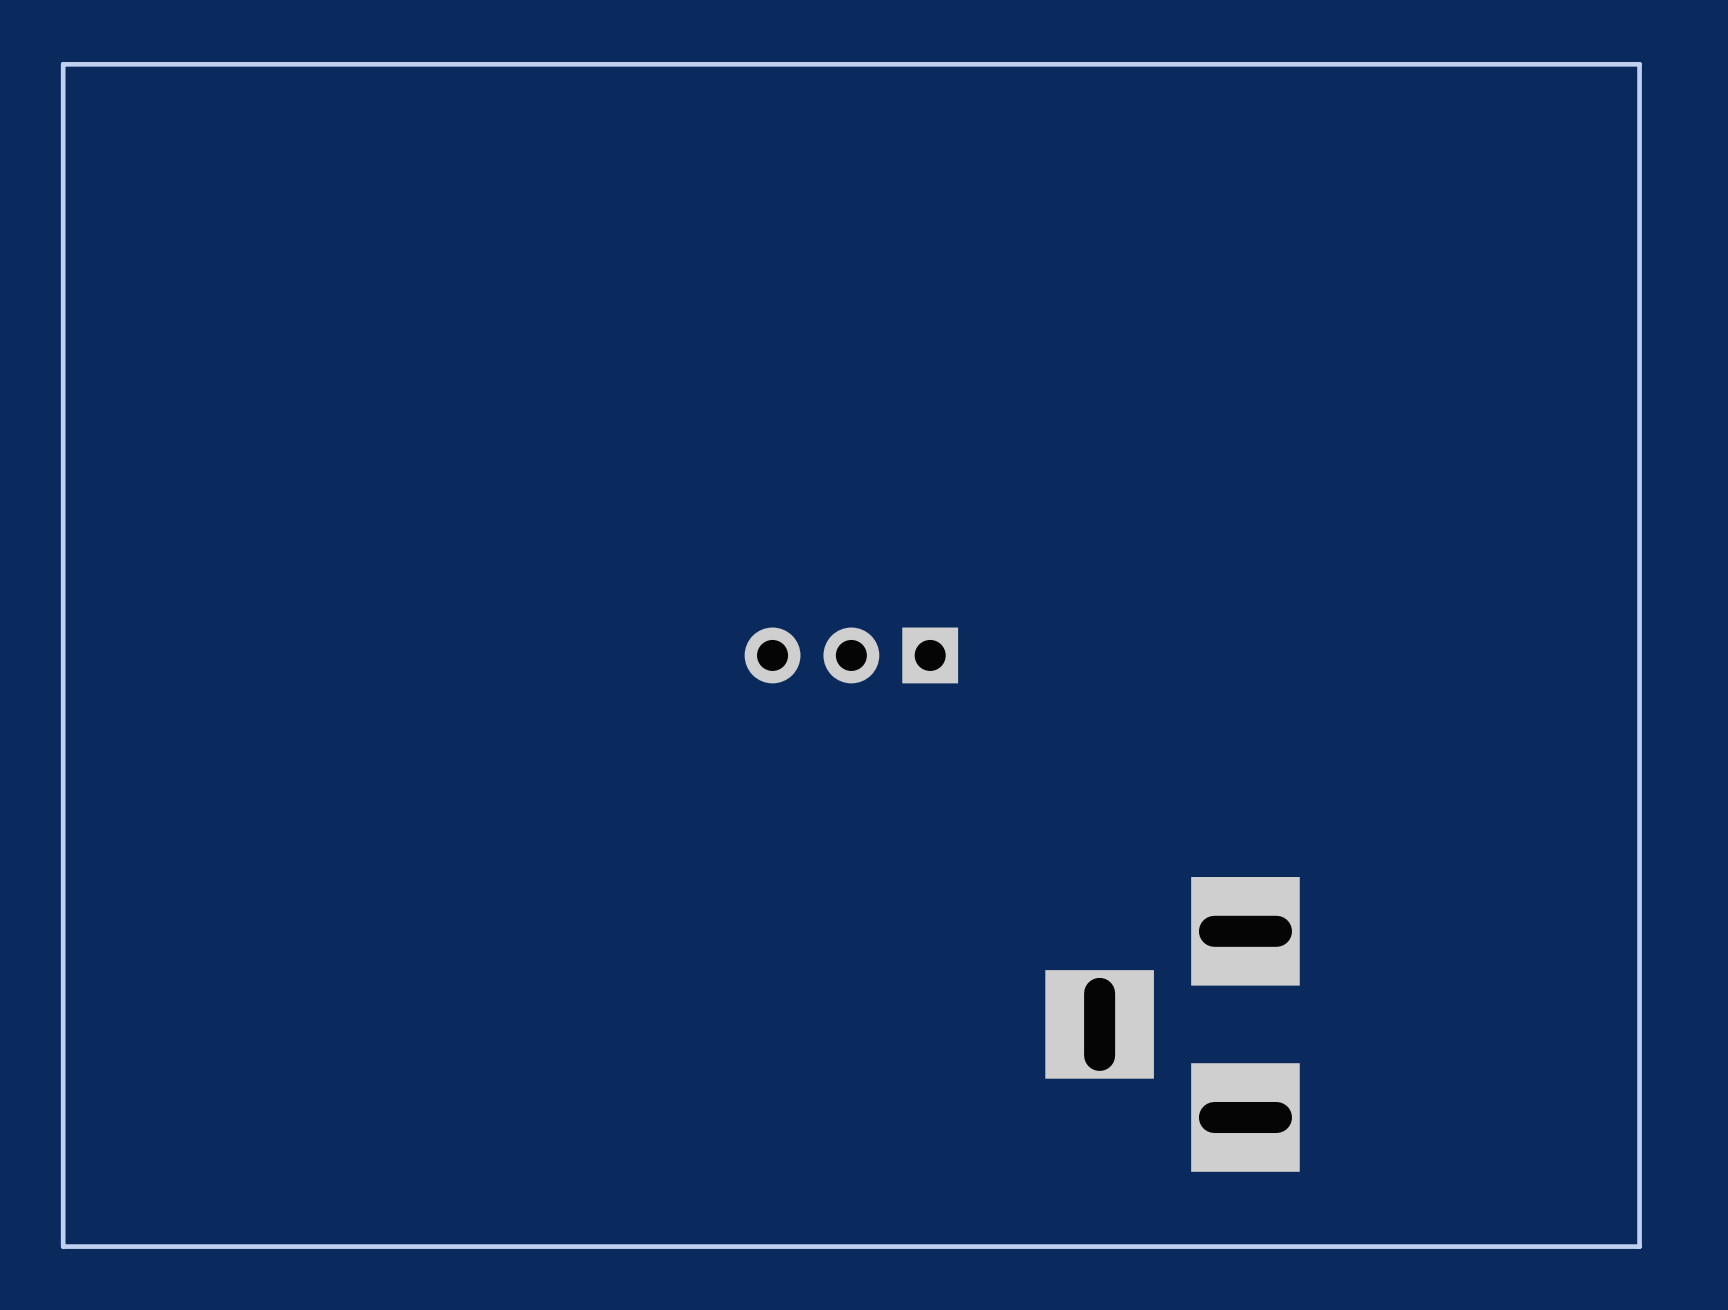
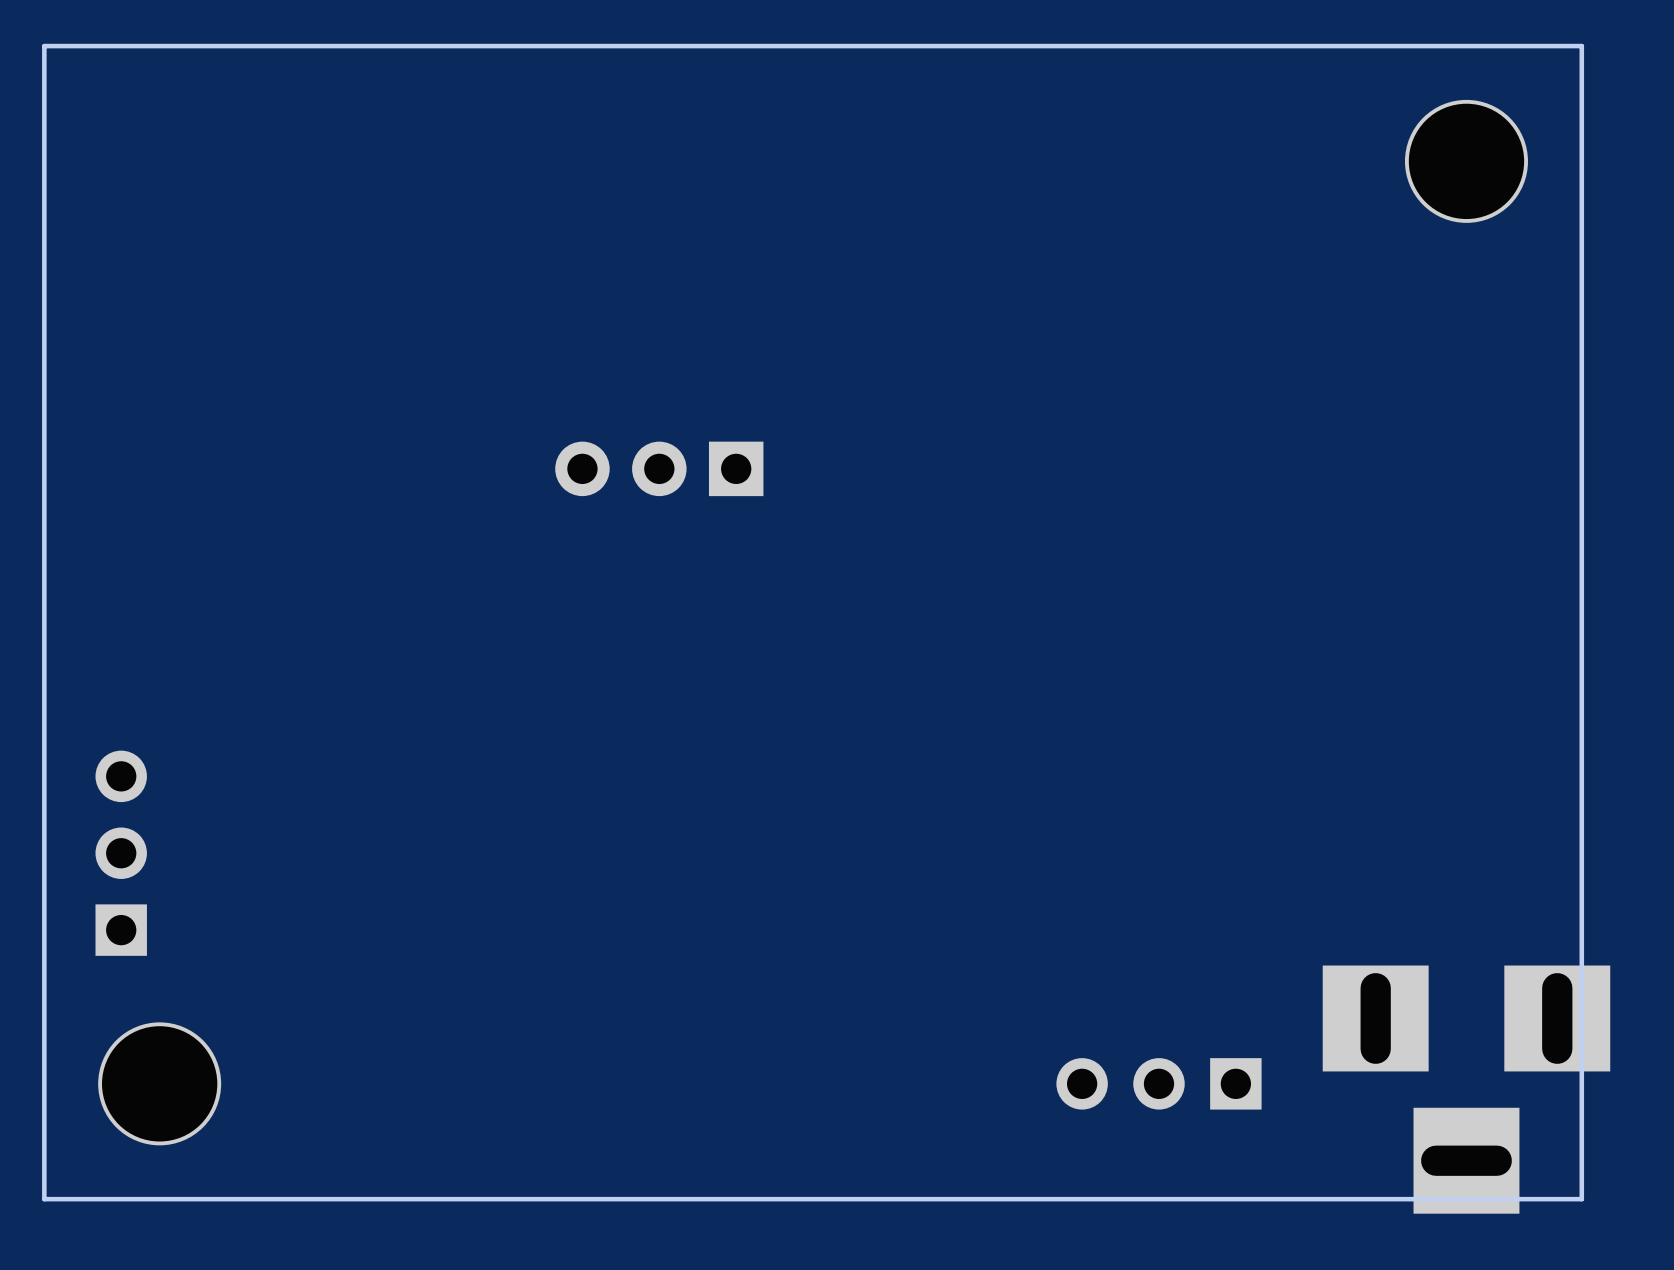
part: none -> (1466, 161)
part position: (851, 655) -> (659, 468)
part: none -> (121, 853)
part rotation: 0° (1172, 1024) -> 90° counterclockwise (1466, 1089)
part position: (1172, 1024) -> (1466, 1089)
part: none -> (159, 1083)
part: none -> (1158, 1083)

